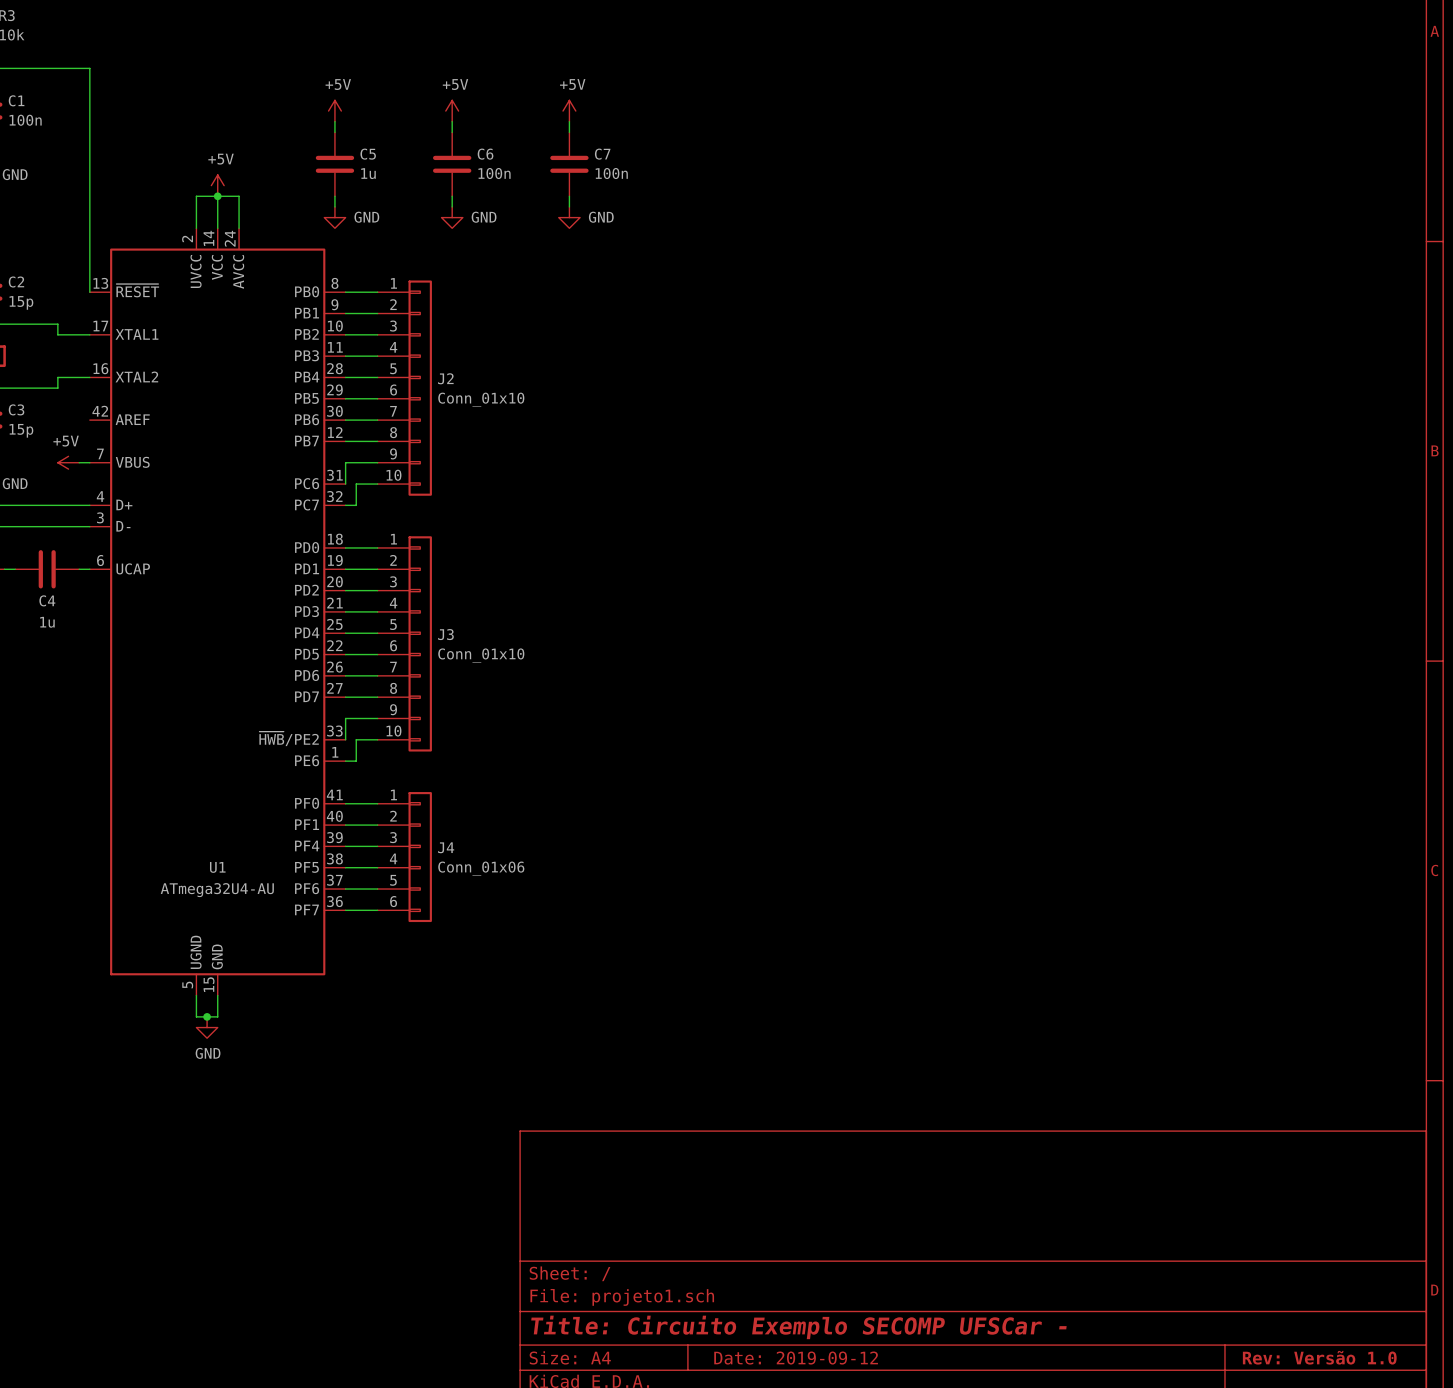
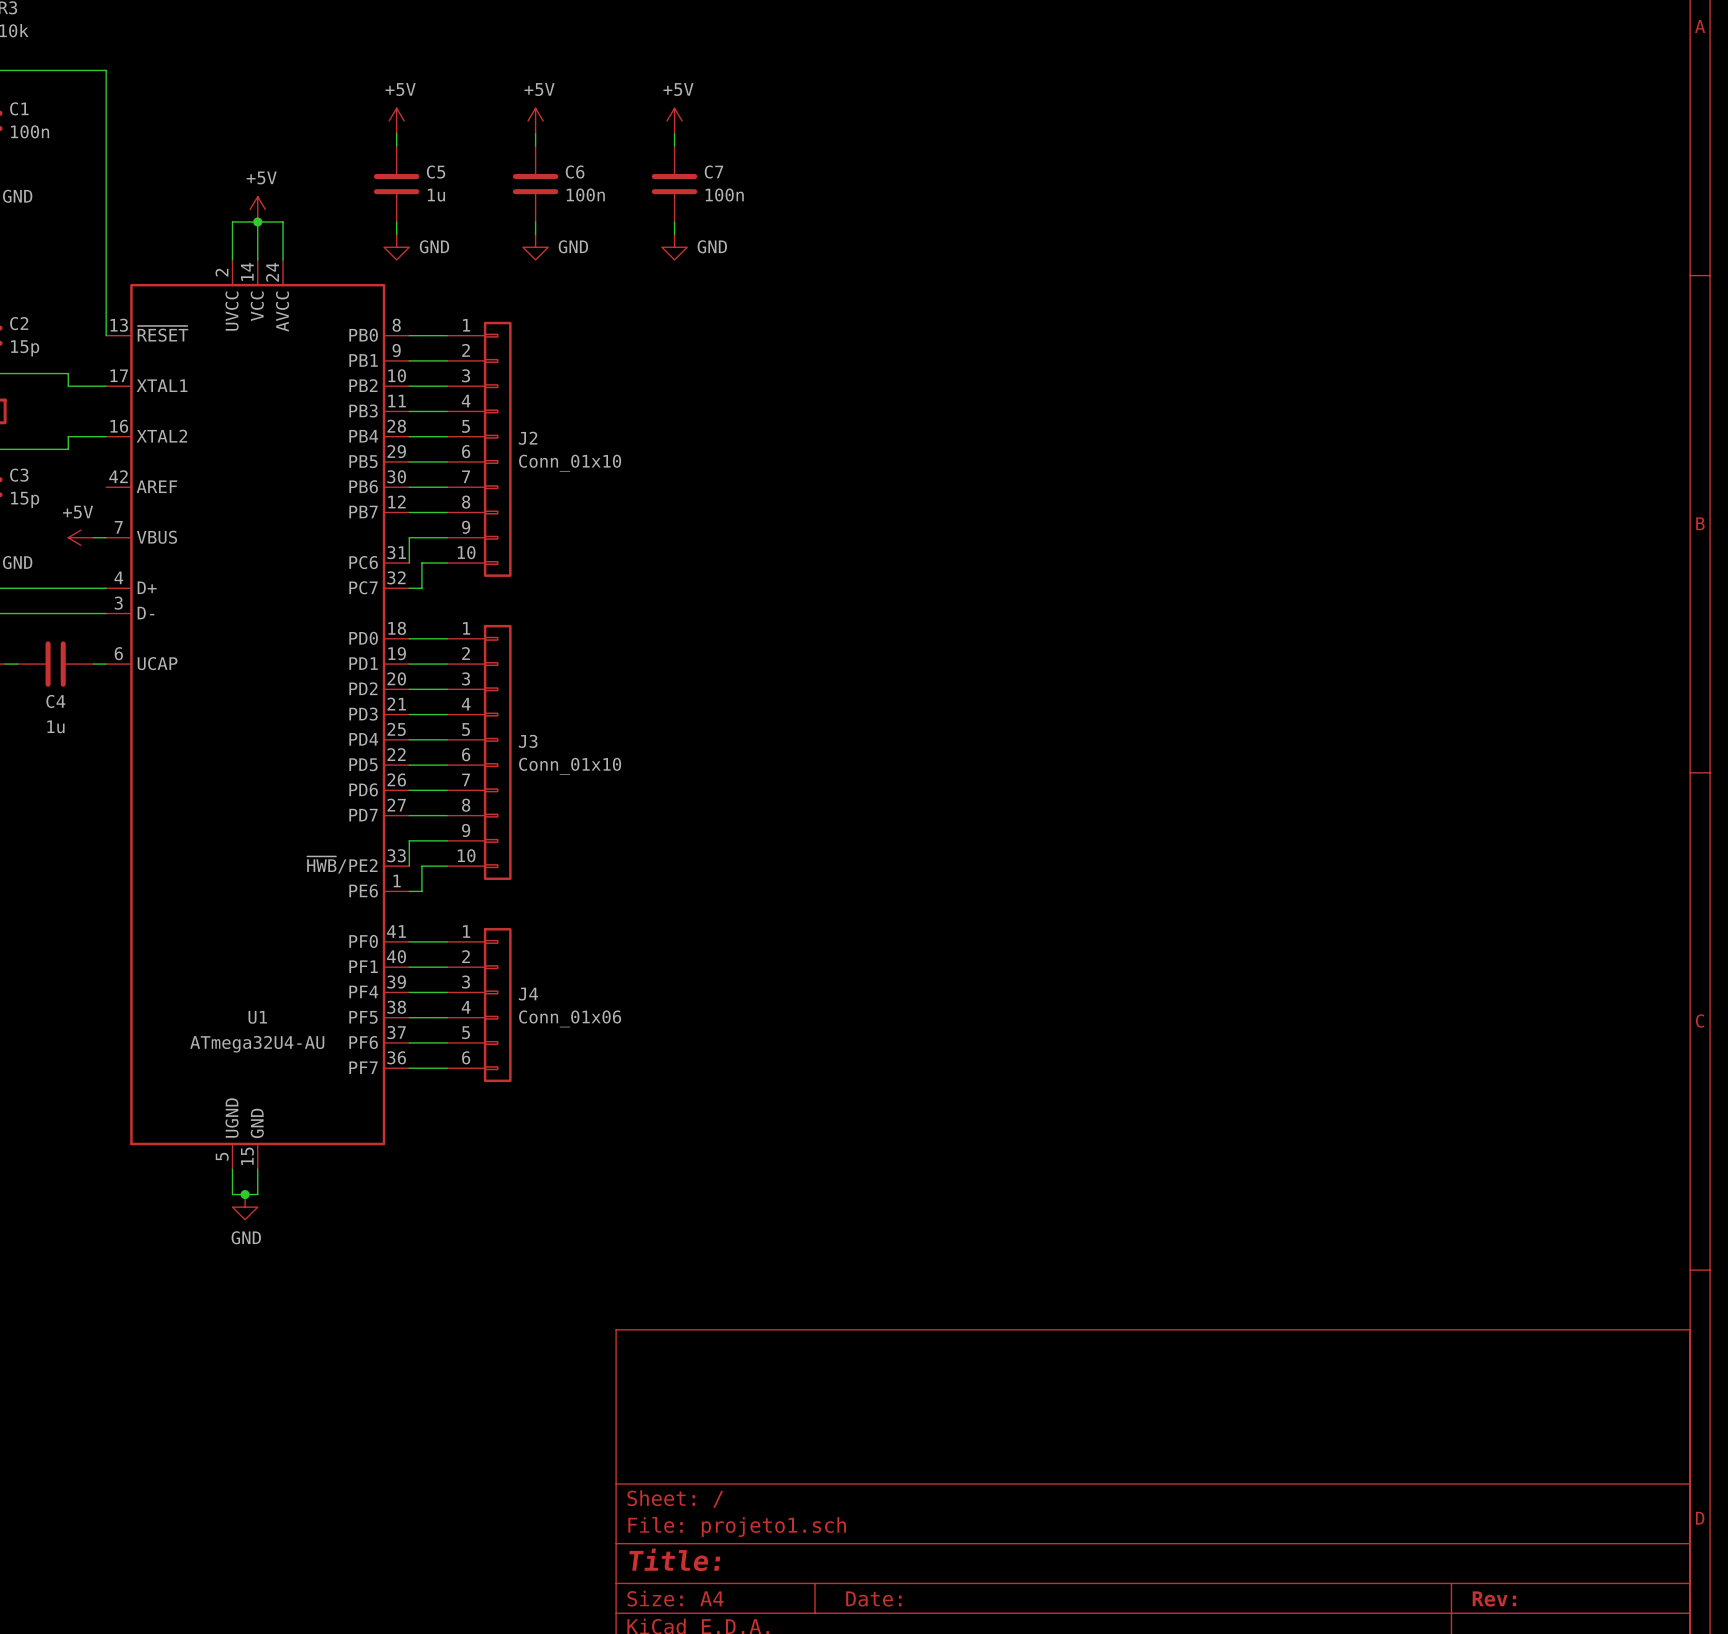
title block: Title: Circuito Exemplo SECOMP UFSCar - (798, 1327) -> Title: (674, 1559)
title block: Rev: Versão 1.0 (1319, 1357) -> Rev: (1494, 1598)
title block: Date: 2019-09-12 (796, 1358) -> Date: (873, 1598)

